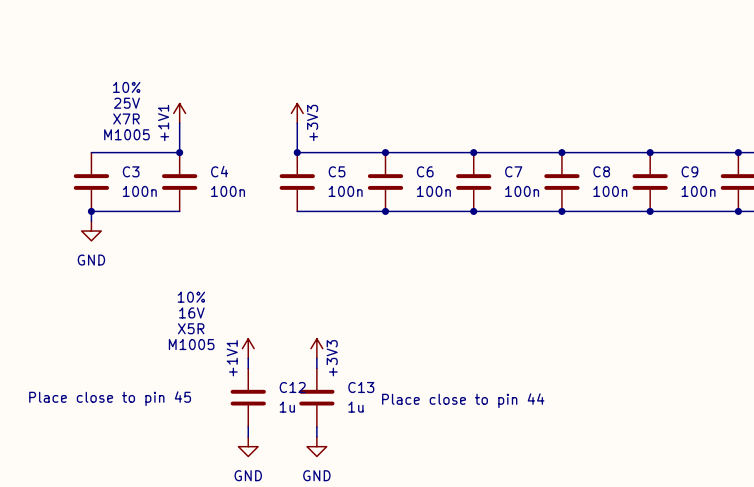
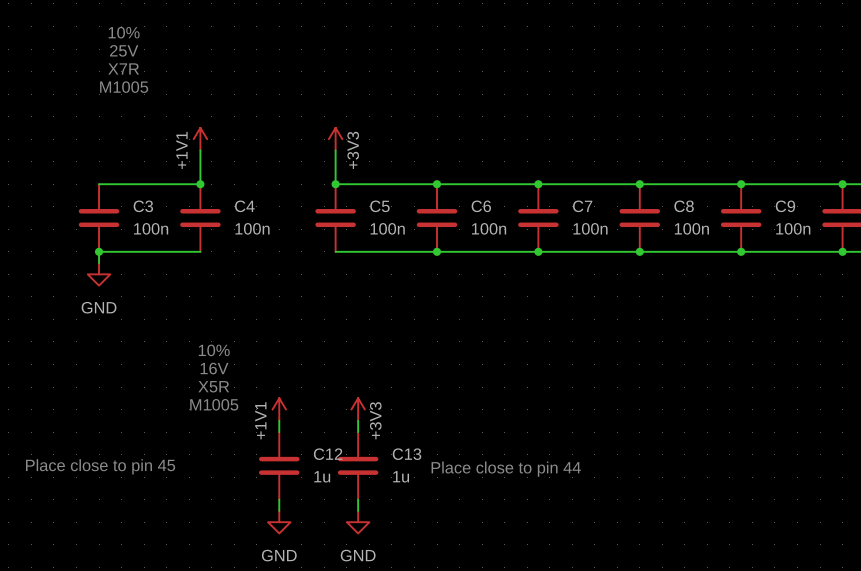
text position: 10% (126, 87) -> 10% (124, 32)
text position: 25V (126, 103) -> 25V (124, 50)
text position: X7R (126, 118) -> X7R (123, 68)
text position: M1005 (126, 134) -> M1005 (124, 87)

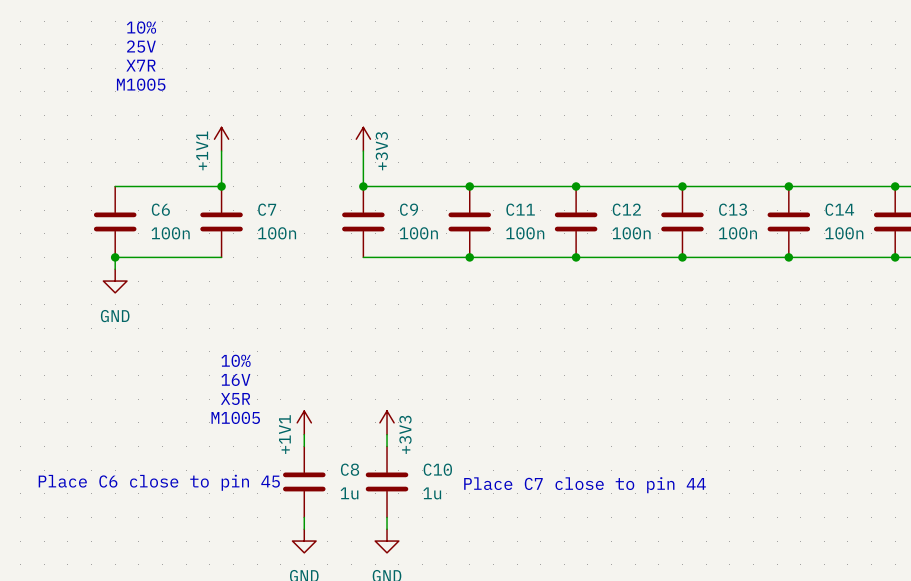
C3 name: C3 (143, 206) -> C6 (160, 209)
C4 name: C4 (244, 206) -> C7 (267, 209)
C5 name: C5 (379, 206) -> C9 (409, 209)
C6 name: C6 (481, 206) -> C11 (520, 209)
C7 name: C7 (582, 206) -> C12 (626, 209)
C8 name: C8 (684, 206) -> C13 (733, 209)
C9 name: C9 (785, 206) -> C14 (839, 209)
C12 name: C12 (328, 454) -> C8 (350, 469)
C13 name: C13 (407, 454) -> C10 (437, 469)
text: Place close to pin 45 (100, 466) -> Place C6 close to pin 45 (159, 482)
text: Place close to pin 44 (506, 469) -> Place C7 close to pin 44 (585, 485)

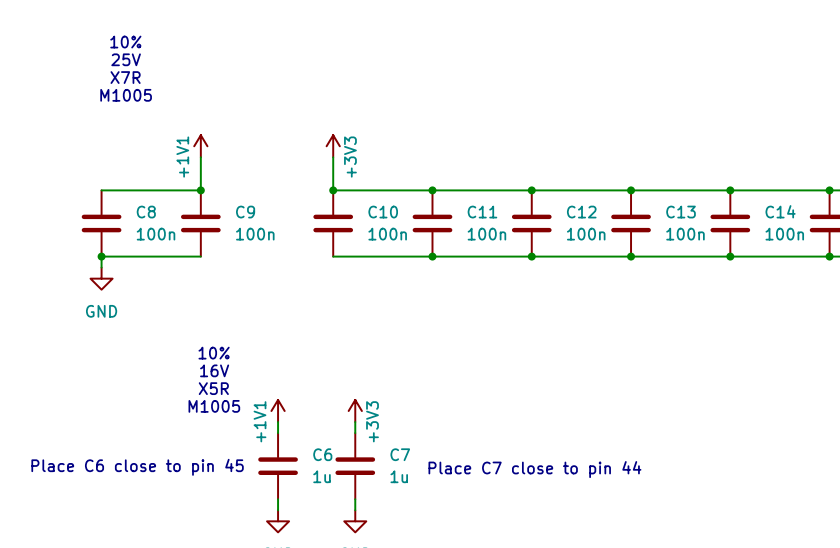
C6 name: C6 (160, 209) -> C8 (146, 212)
C7 name: C7 (267, 209) -> C9 (245, 212)
C9 name: C9 (409, 209) -> C10 (383, 212)
C8 name: C8 (350, 469) -> C6 (322, 454)
C10 name: C10 (437, 469) -> C7 (400, 454)

